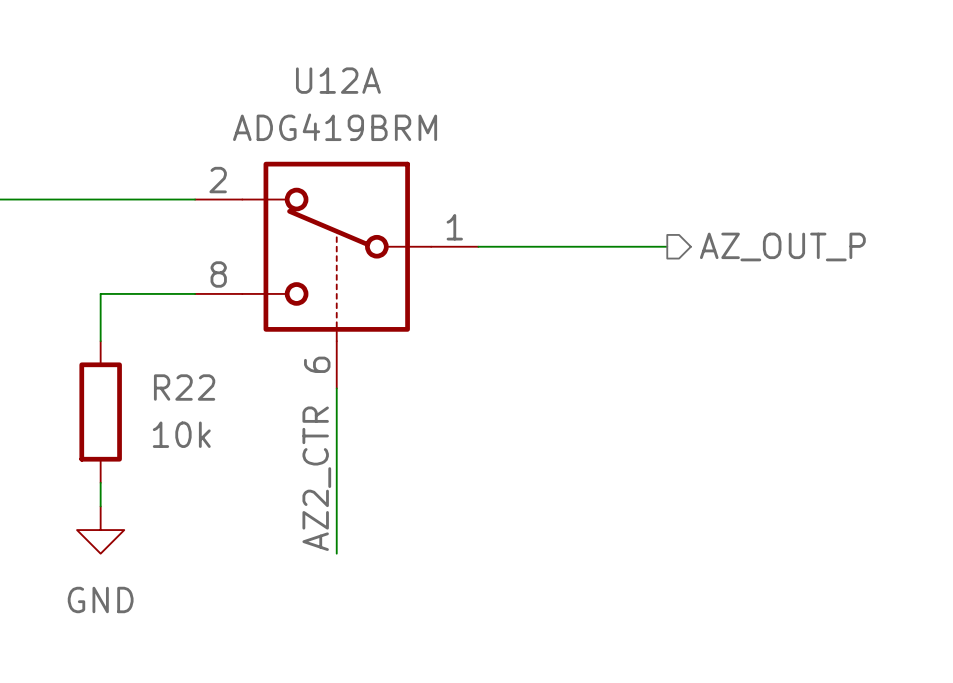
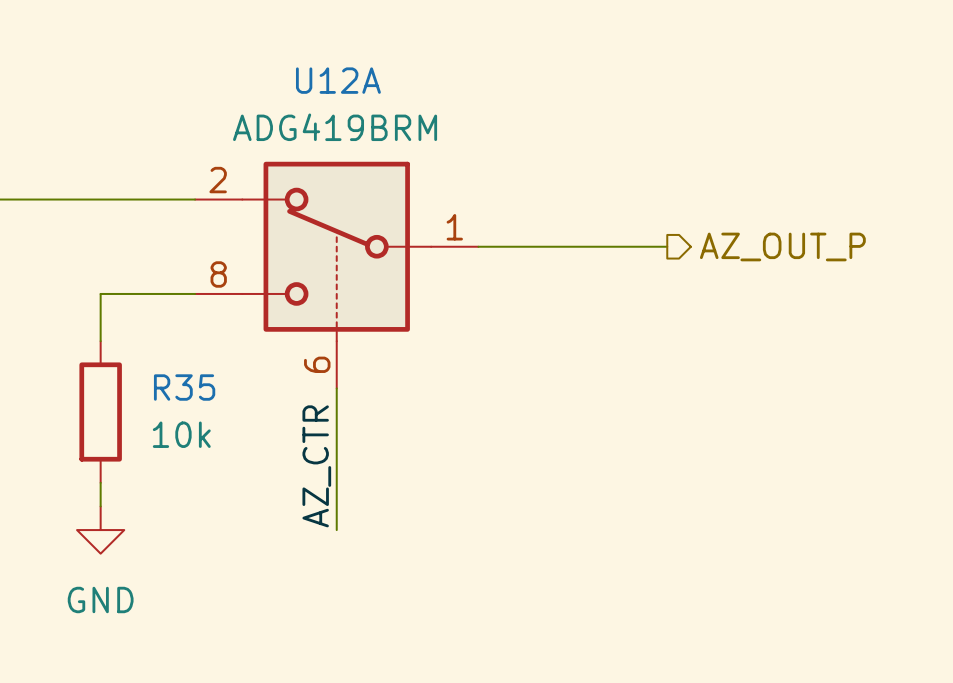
R22 name: R22 (184, 387) -> R35 (184, 387)
label: AZ2_CTR (316, 478) -> AZ_CTR (316, 466)
wire: (336, 530) (336, 553) -> none

